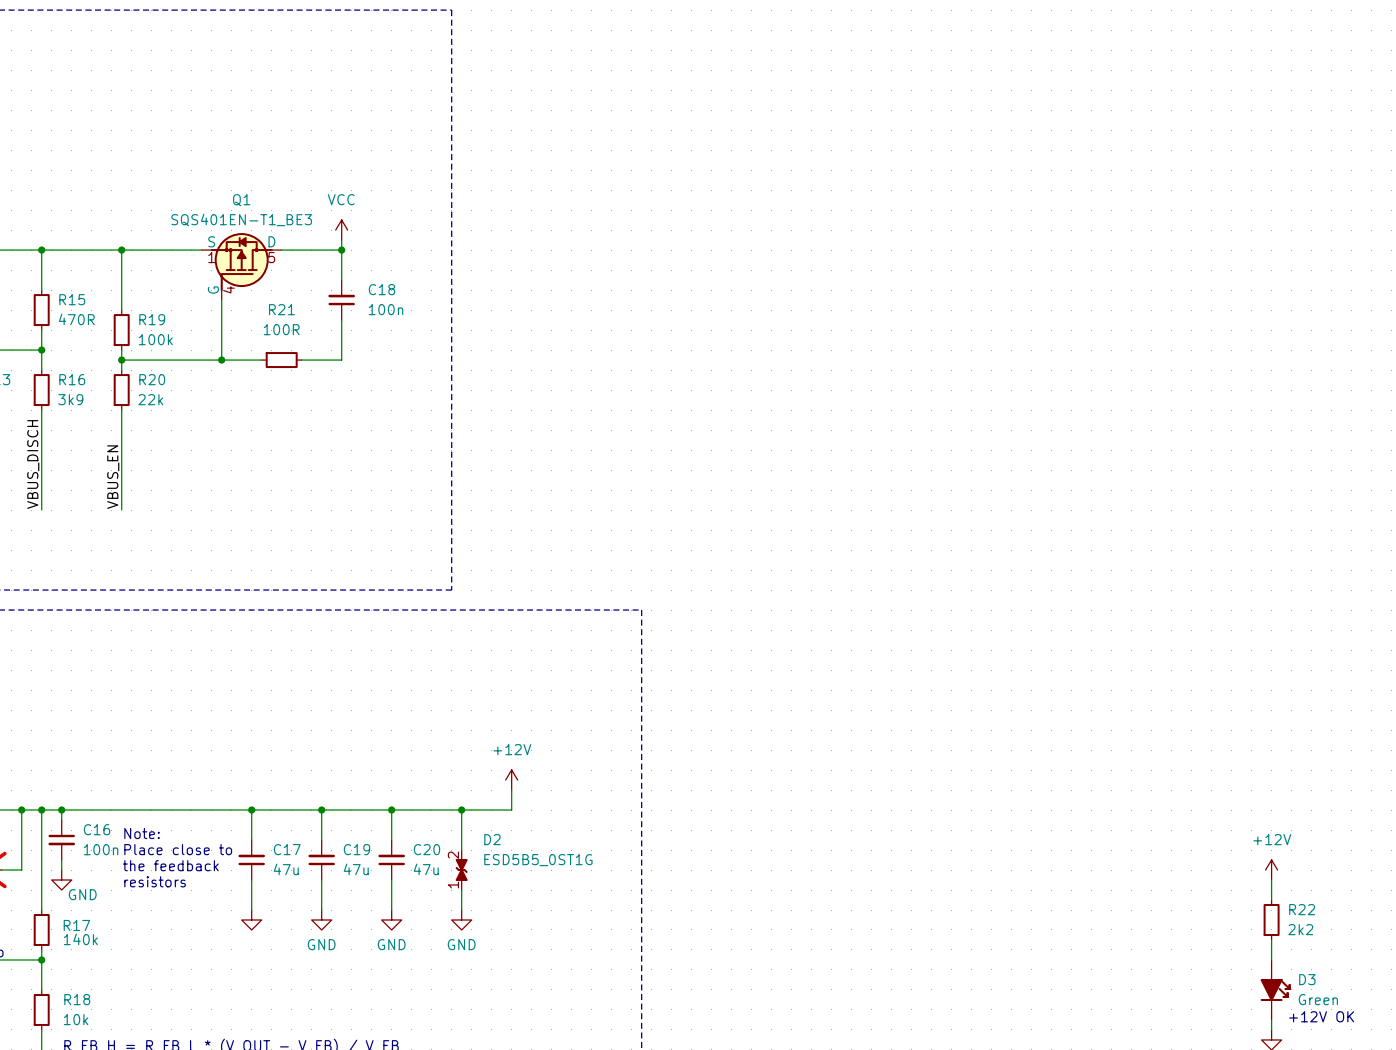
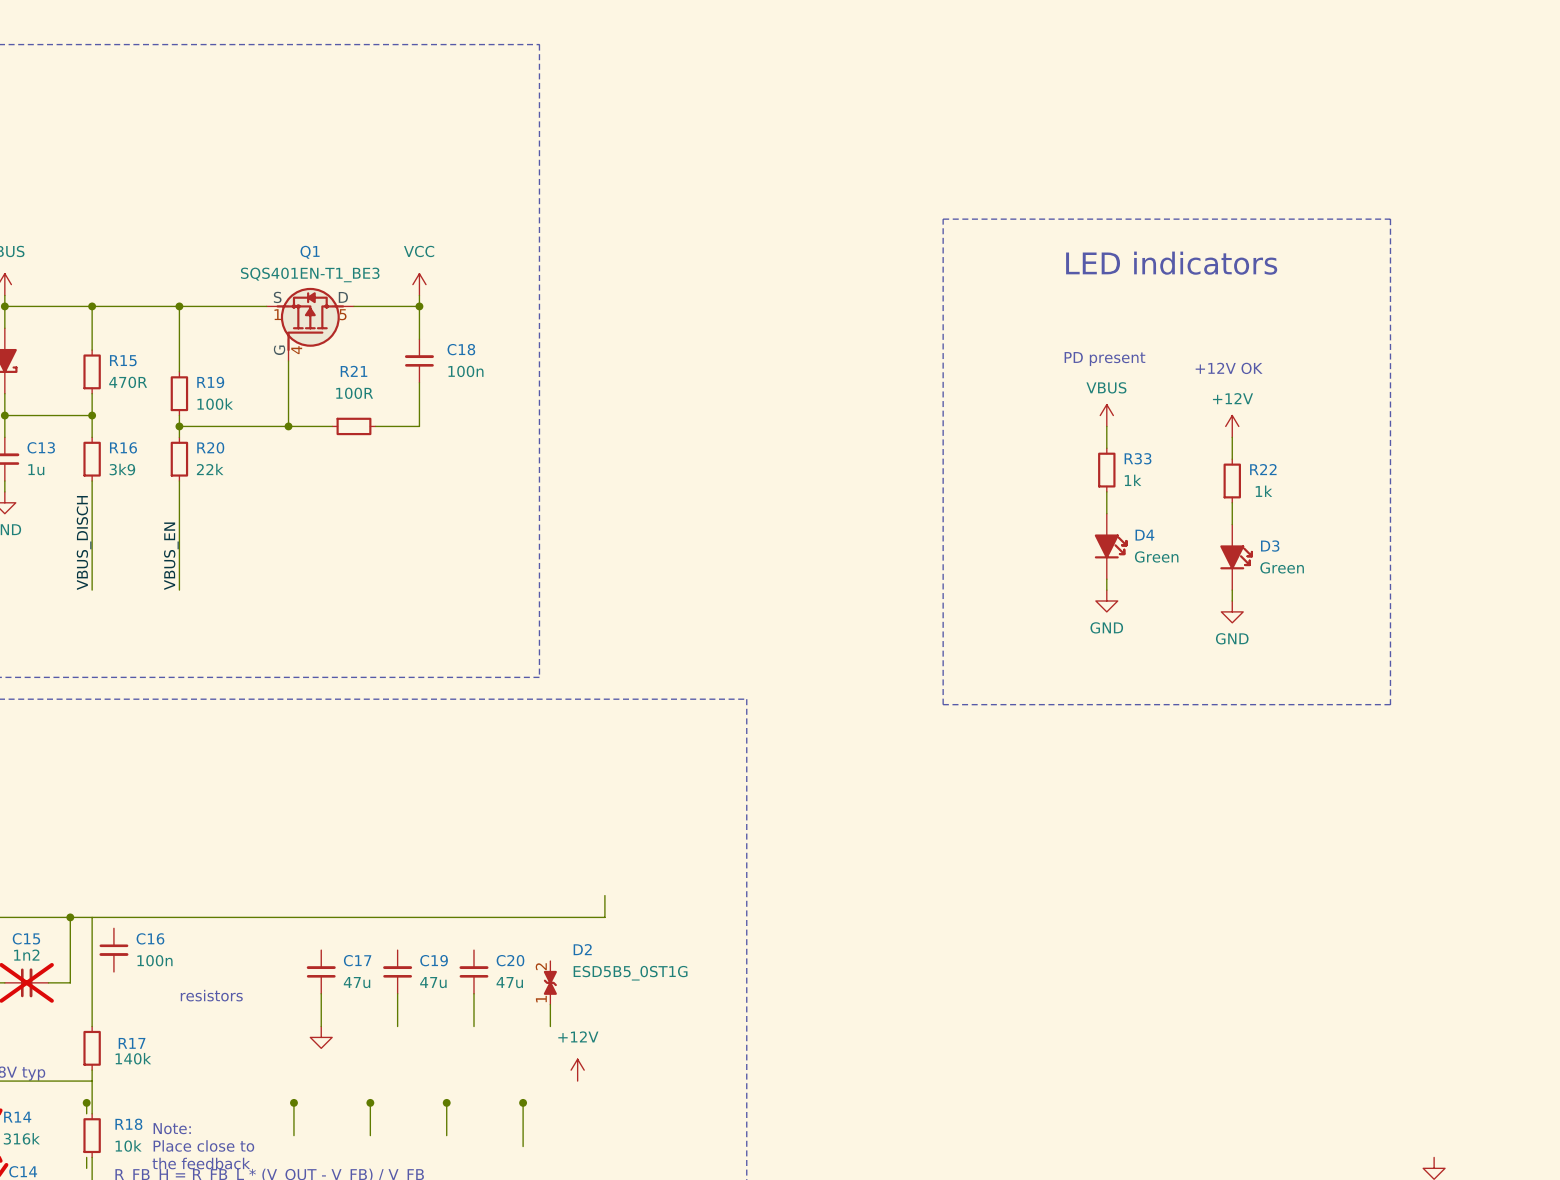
line: none -> (943, 219) (1390, 219) (1390, 704) (943, 704) (943, 219)
text: none -> LED indicators (1171, 263)
text: none -> PD present (1104, 359)
text: none -> +12V OK (1229, 368)
power symbol: none -> VBUS (1106, 415)
wire: none -> (1106, 426) (1106, 448)
power symbol: none -> +12V (1232, 426)
wire: none -> (1232, 437) (1232, 459)
R33: none -> (1106, 470)
wire: none -> (1106, 491) (1106, 513)
wire: none -> (1232, 502) (1232, 524)
D4: none -> (1111, 546)
wire: none -> (1106, 579) (1106, 590)
wire: none -> (1232, 590) (1232, 601)
power symbol: none -> GND (1106, 601)
power symbol: none -> GND (1232, 611)
power symbol position: +12V (511, 780) -> +12V (577, 1070)
junction: (41, 810) -> none
wire: (61, 810) (61, 820) -> (86, 1102) (86, 1113)
junction: (61, 810) -> none
wire: (251, 810) (251, 840) -> (293, 1102) (293, 1135)
junction: (251, 810) -> none
wire: (321, 810) (321, 840) -> (370, 1102) (370, 1135)
junction: (321, 810) -> none
wire: (391, 810) (391, 840) -> (446, 1102) (446, 1135)
junction: (391, 810) -> none
wire: (461, 810) (461, 850) -> (523, 1102) (523, 1146)
junction: (461, 810) -> none
text: Note: (142, 833) -> none
text position: Place close to (178, 849) -> Place close to (203, 1145)
wire: (61, 860) (61, 870) -> (86, 1157) (86, 1168)
text position: the feedback (170, 865) -> the feedback (201, 1163)
power symbol: +12V (1271, 870) -> none
power symbol: GND (61, 880) -> none
wire: (1271, 880) (1271, 900) -> none
power symbol: GND (321, 919) -> none
power symbol: GND (391, 919) -> none
power symbol: GND (461, 919) -> none
R22 position: (1271, 919) -> (1232, 480)
R22 text: 2k2 (1300, 929) -> 1k (1263, 491)
wire: (1271, 939) (1271, 959) -> none
junction position: (41, 959) -> (86, 1102)
junction: none -> (293, 1102)
junction: none -> (370, 1102)
junction: none -> (446, 1102)
junction: none -> (523, 1102)
D3 position: (1275, 989) -> (1236, 557)
text: none -> Note: (172, 1128)
text: +12V OK (1321, 1016) -> none
wire: (1271, 1019) (1271, 1029) -> none

